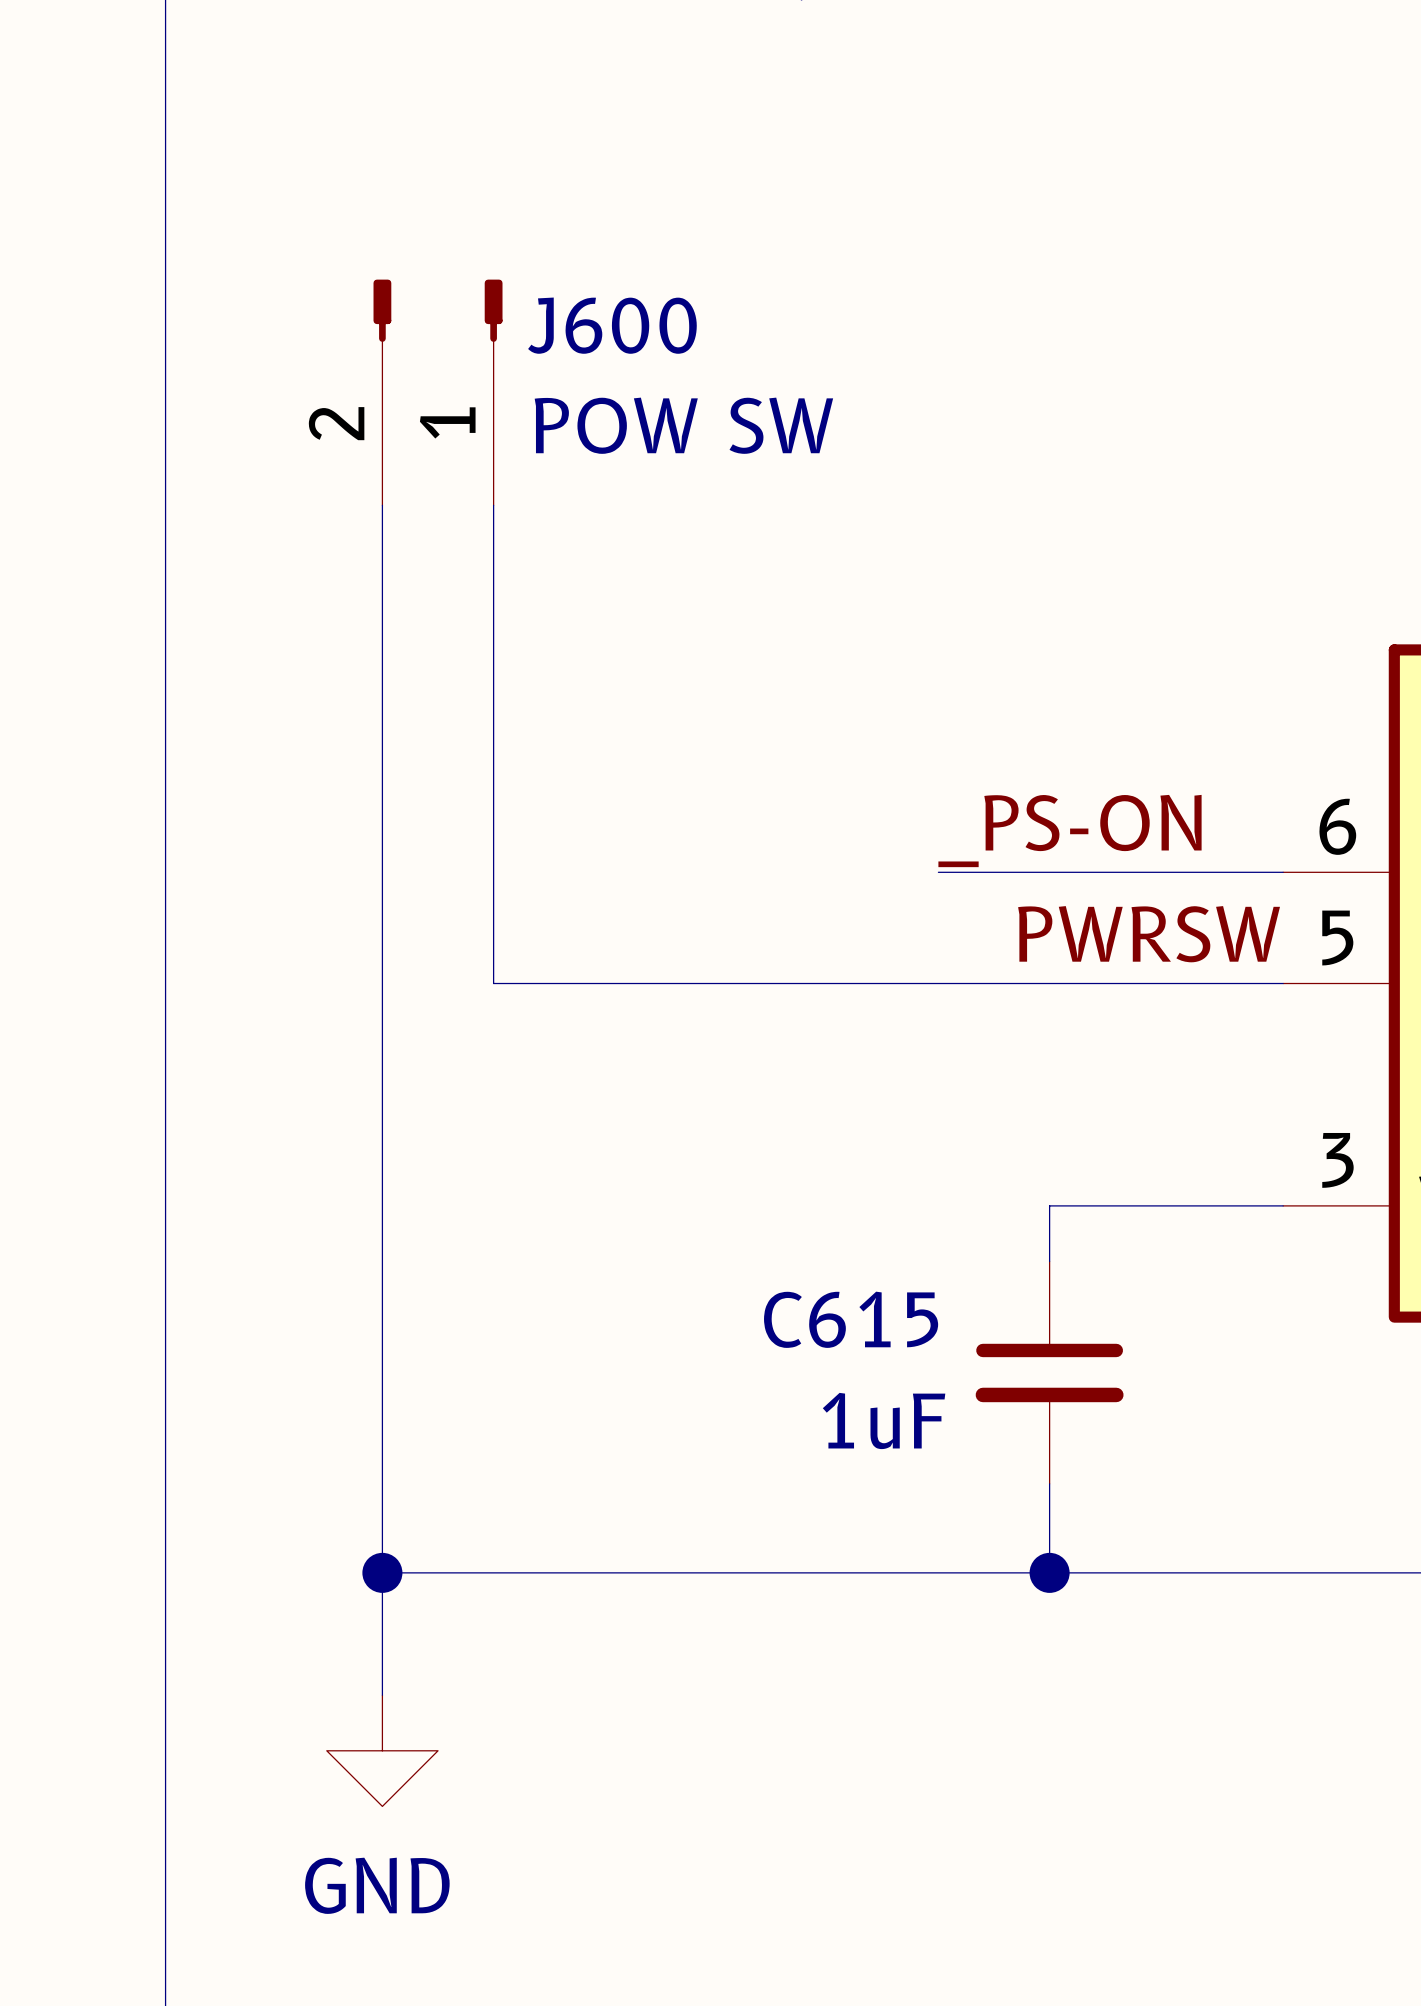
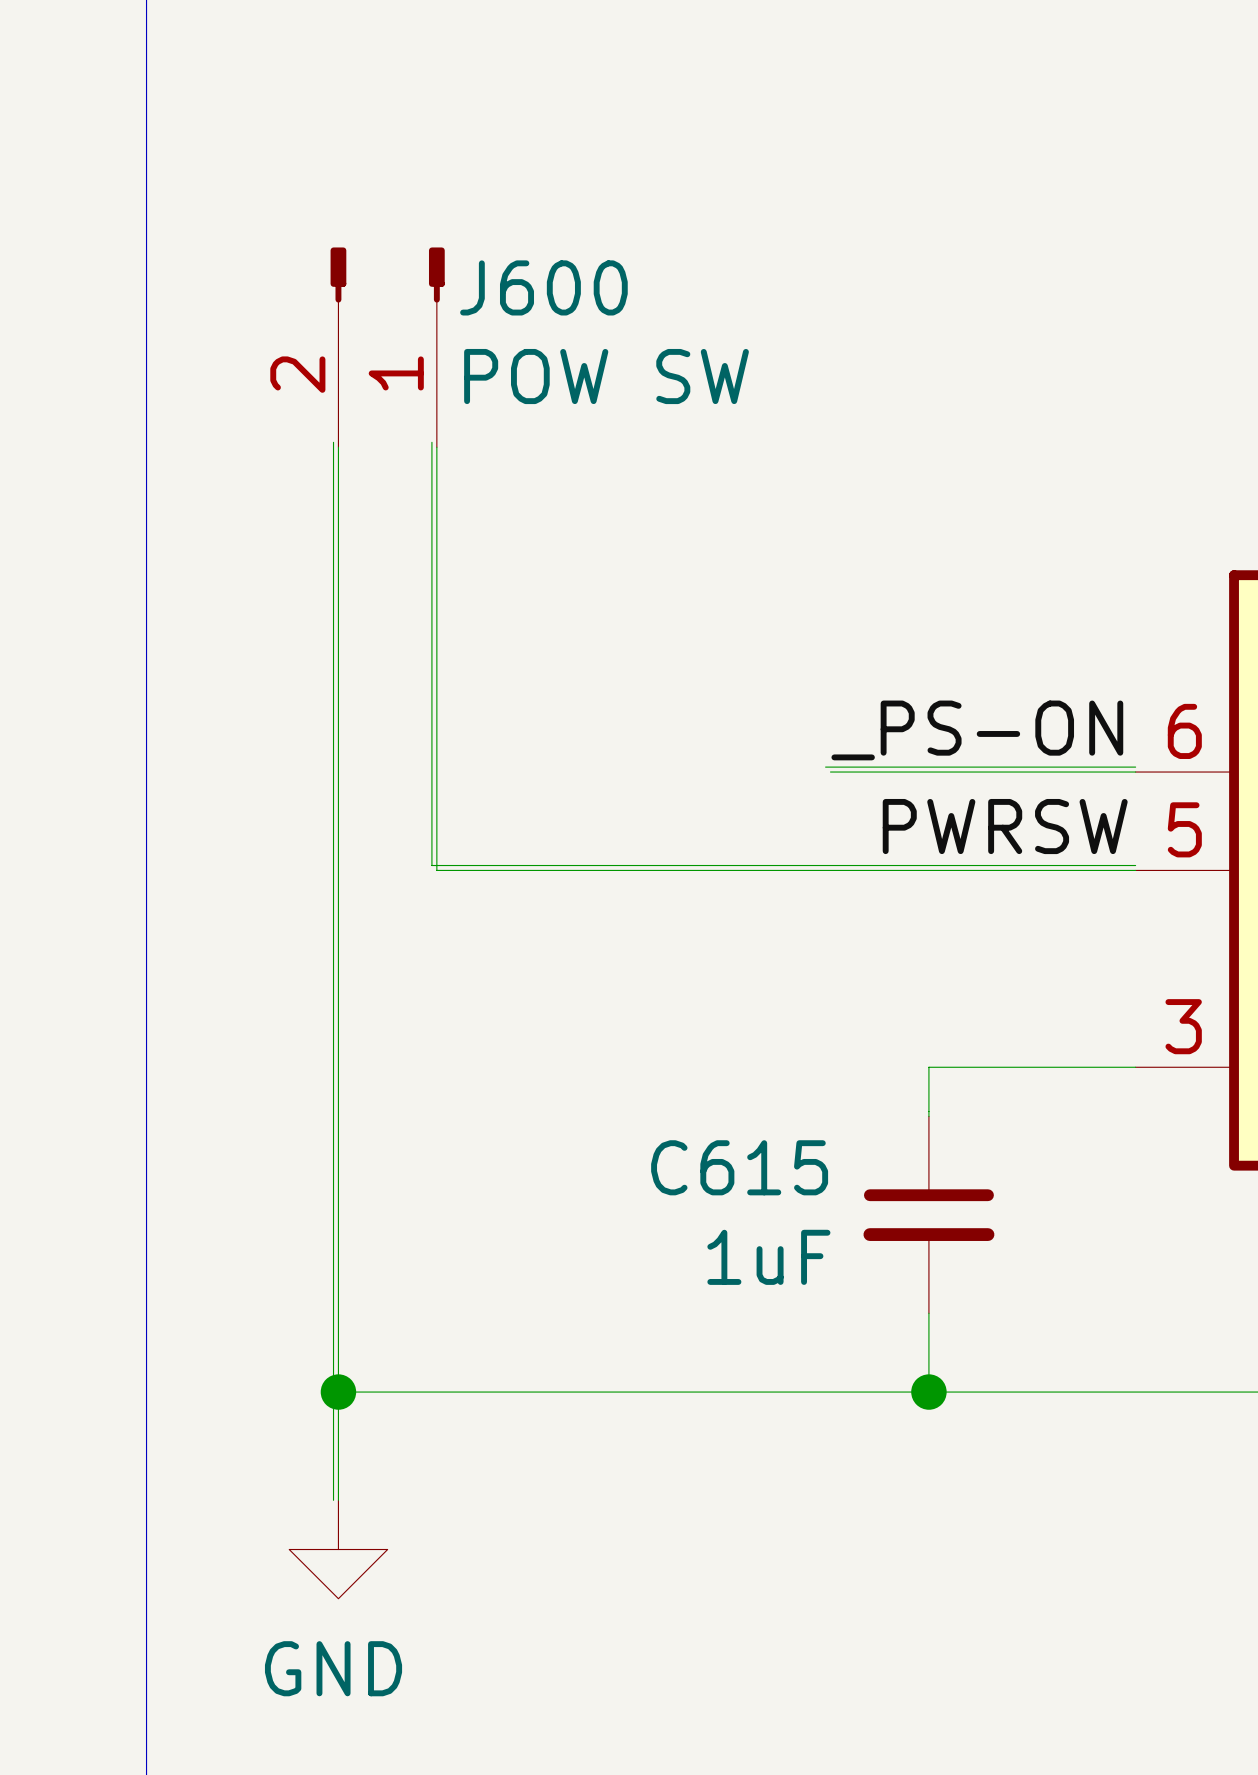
wire: none -> (333, 442) (333, 1500)
wire: none -> (431, 442) (431, 865) (1135, 865)
wire: none -> (825, 767) (1135, 767)

